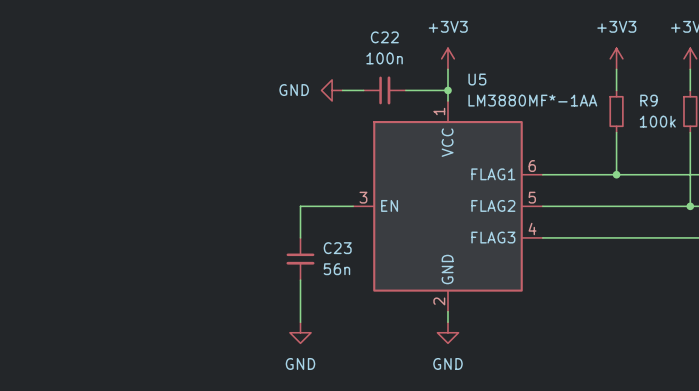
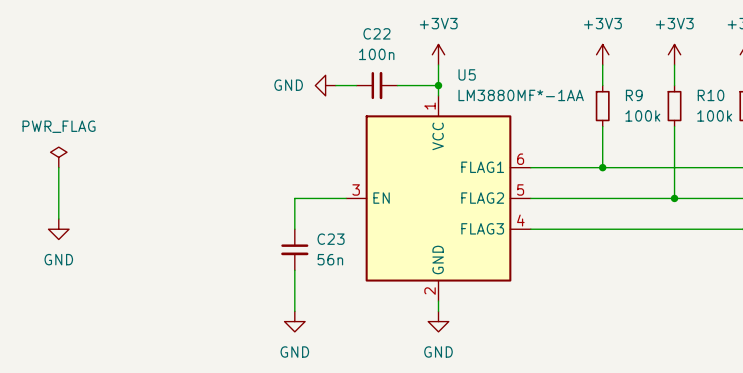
power symbol: none -> PWR_FLAG (58, 157)
wire: none -> (58, 167) (58, 218)
power symbol: none -> GND (58, 229)

